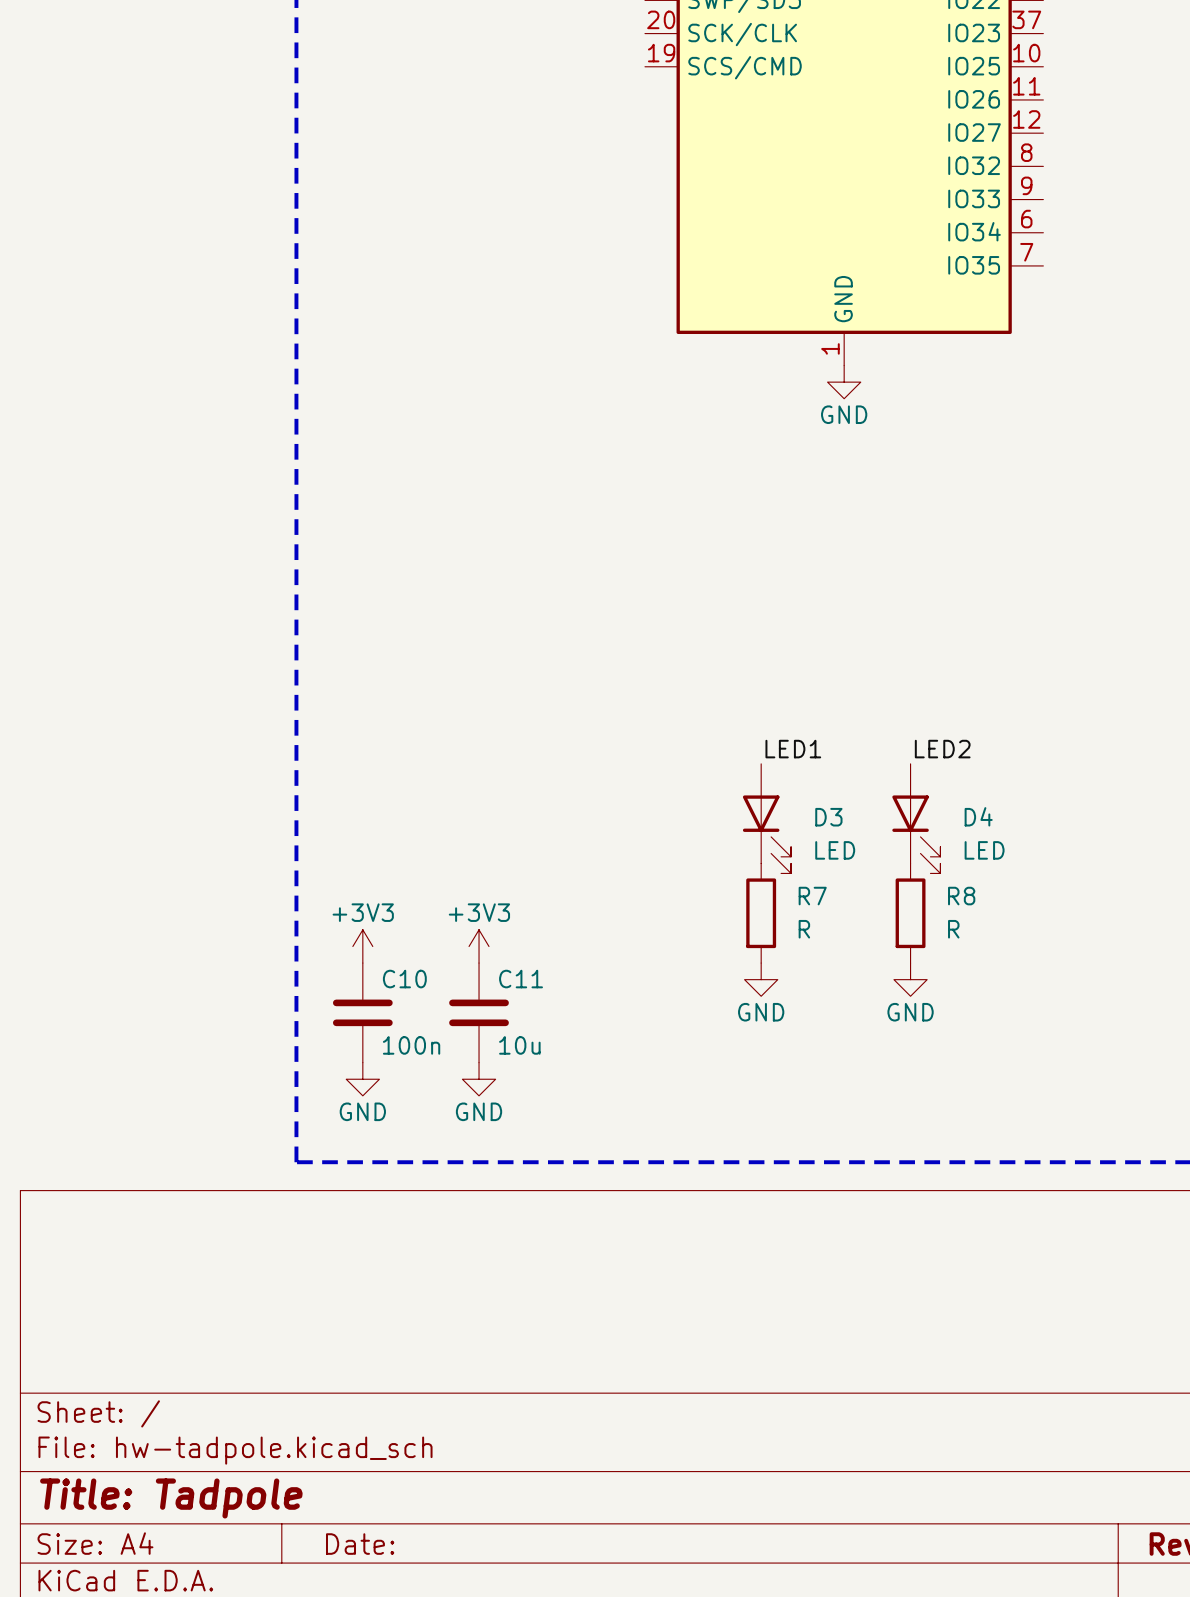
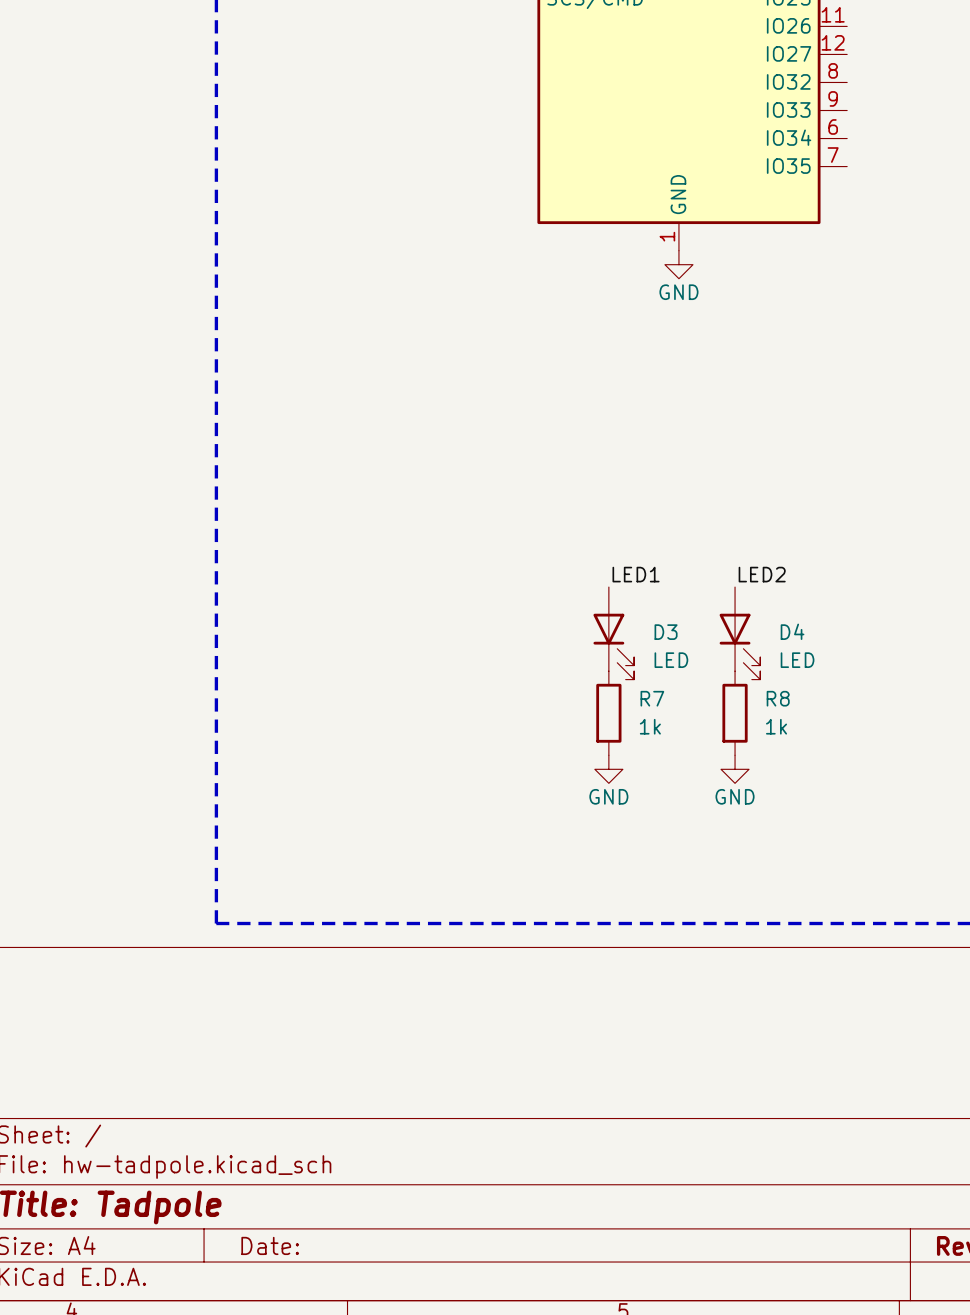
R7 value: R (804, 929) -> 1k (650, 726)
R8 value: R (953, 929) -> 1k (776, 726)
power symbol: +3V3 (362, 946) -> none
power symbol: +3V3 (479, 946) -> none
C10: 100n (362, 1012) -> none
C11: 10u (479, 1012) -> none
power symbol: GND (362, 1079) -> none
power symbol: GND (479, 1079) -> none

